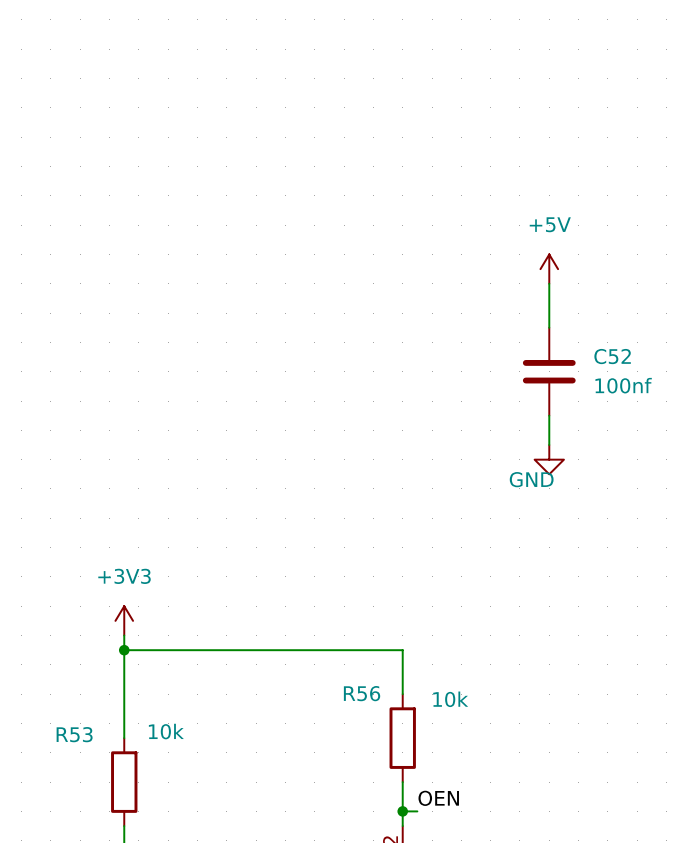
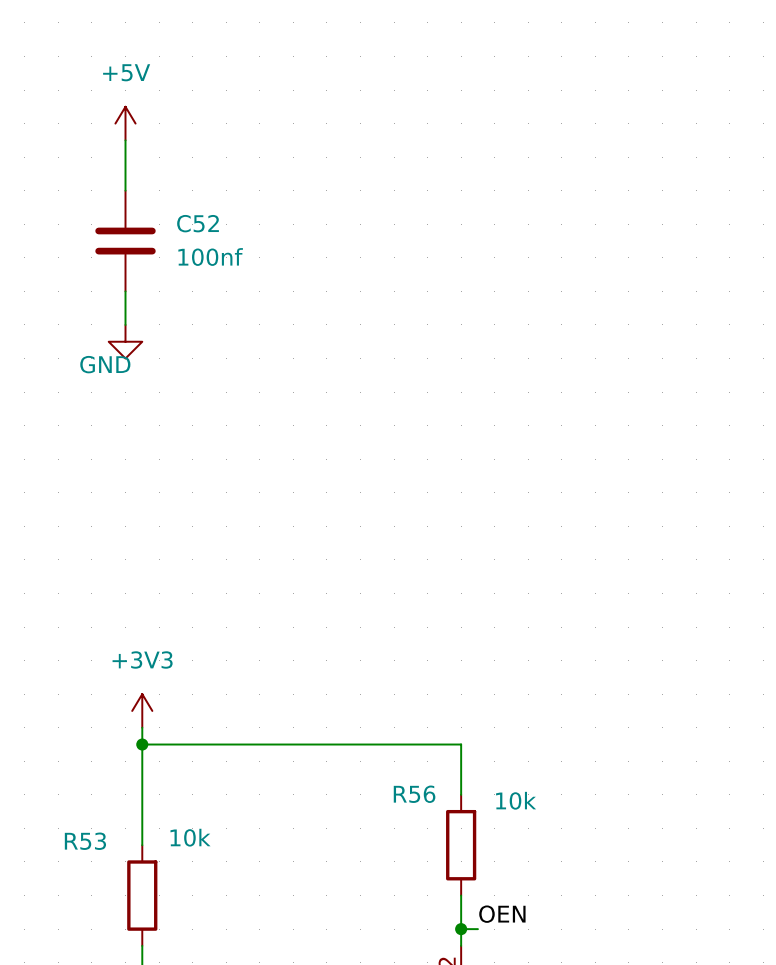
power symbol: none -> +5V (125, 123)
wire: none -> (125, 140) (125, 190)
wire: none -> (125, 291) (125, 324)
power symbol: +5V (549, 269) -> none
wire: (549, 283) (549, 327) -> none
power symbol: none -> GND (125, 341)
C52 position: (549, 371) -> (125, 241)
wire: (549, 415) (549, 445) -> none
power symbol: GND (549, 459) -> none

